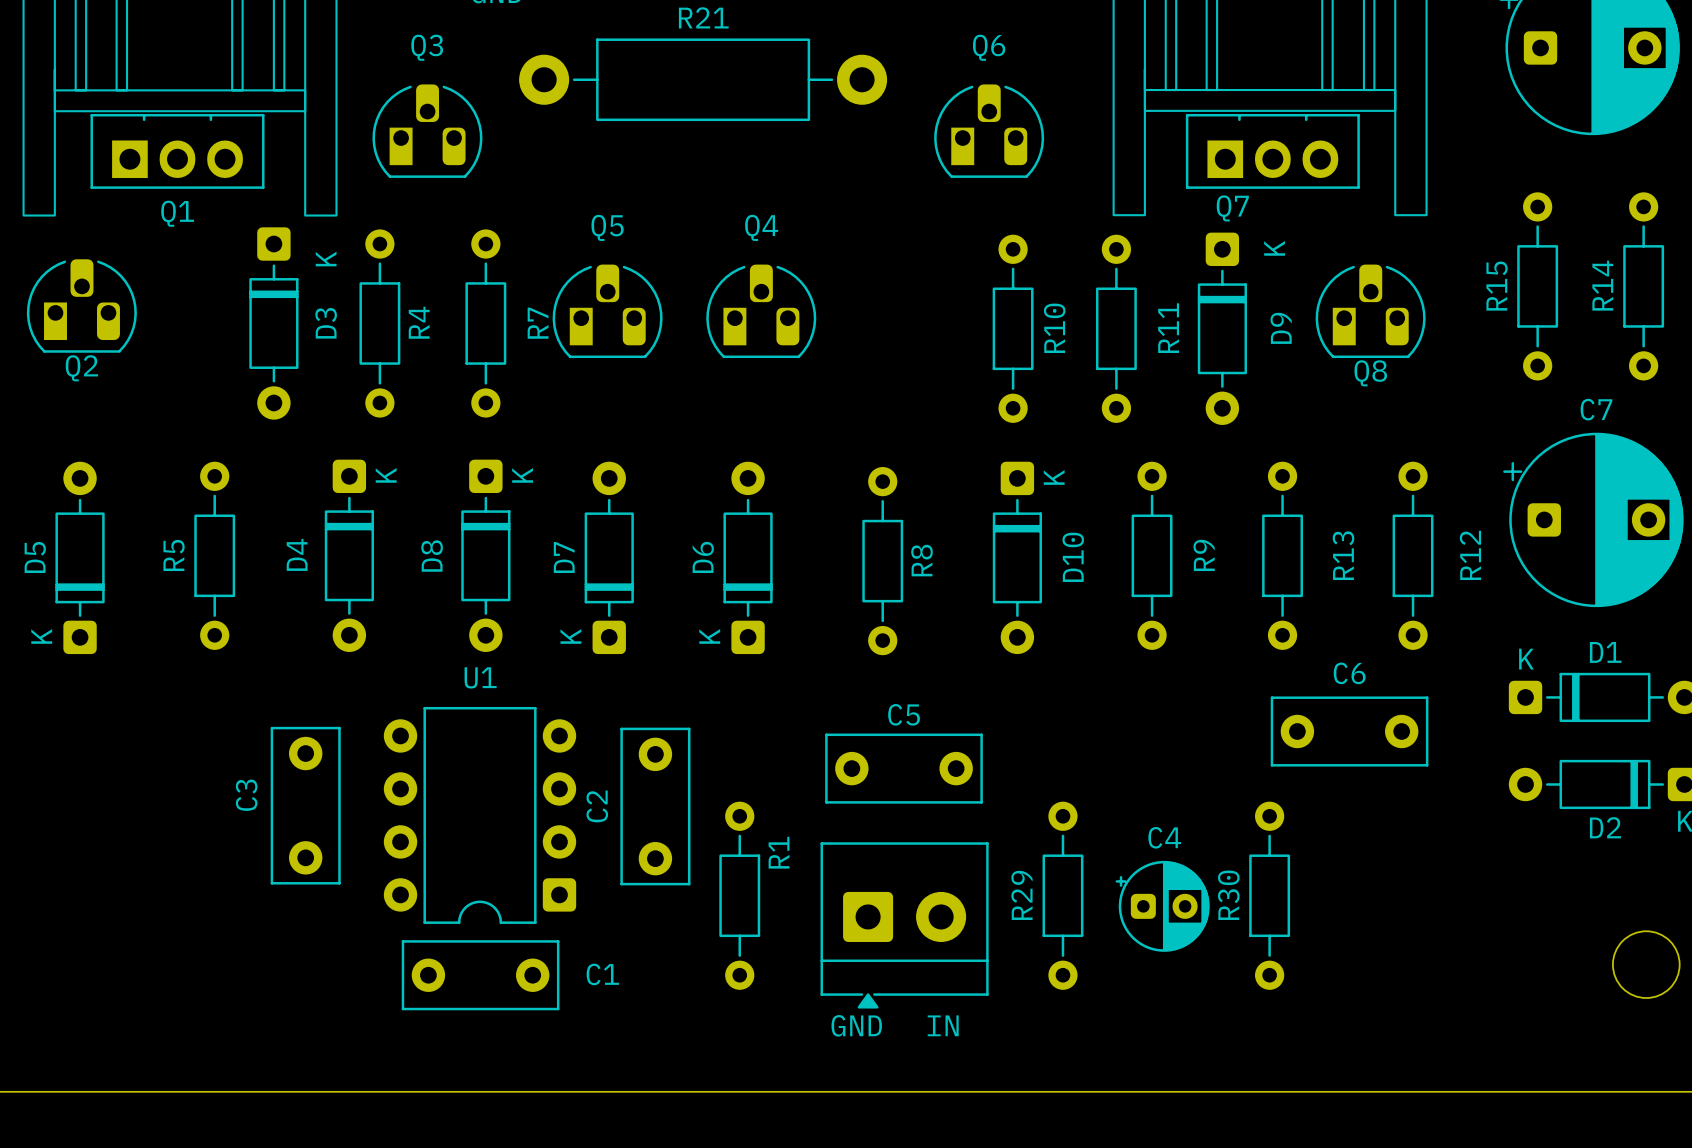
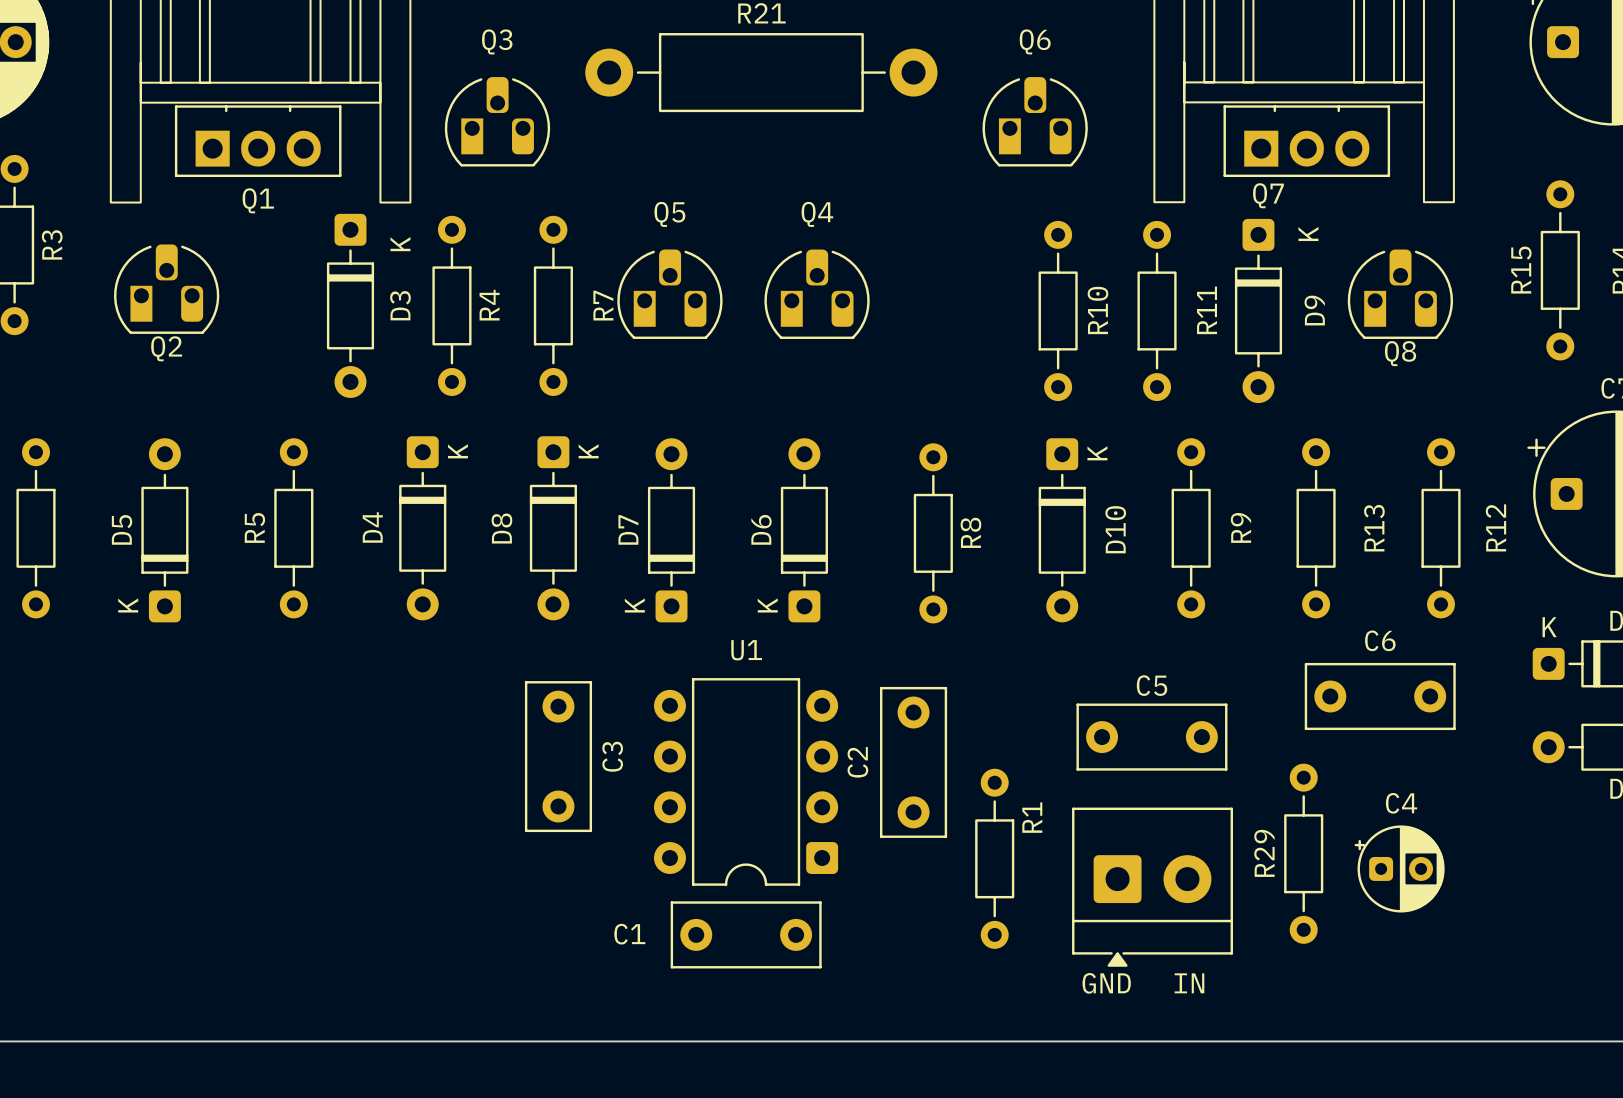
C5 position: (904, 768) -> (1151, 737)
C3 name position: C3 (246, 795) -> C3 (612, 756)
C3 position: (305, 805) -> (558, 756)
C2 position: (655, 806) -> (913, 762)
U1 position: (480, 815) -> (746, 781)
R1 position: (739, 895) -> (994, 858)
R29: (1062, 895) -> none
R30 name: R30 (1228, 895) -> R29 (1264, 853)
C4 position: (1162, 906) -> (1399, 868)
part position: (904, 925) -> (1152, 887)
C1 name position: C1 (602, 974) -> C1 (629, 934)
C1 position: (480, 975) -> (746, 934)
text position: GND (856, 1025) -> GND (1106, 983)
text position: IN (943, 1025) -> IN (1189, 983)

